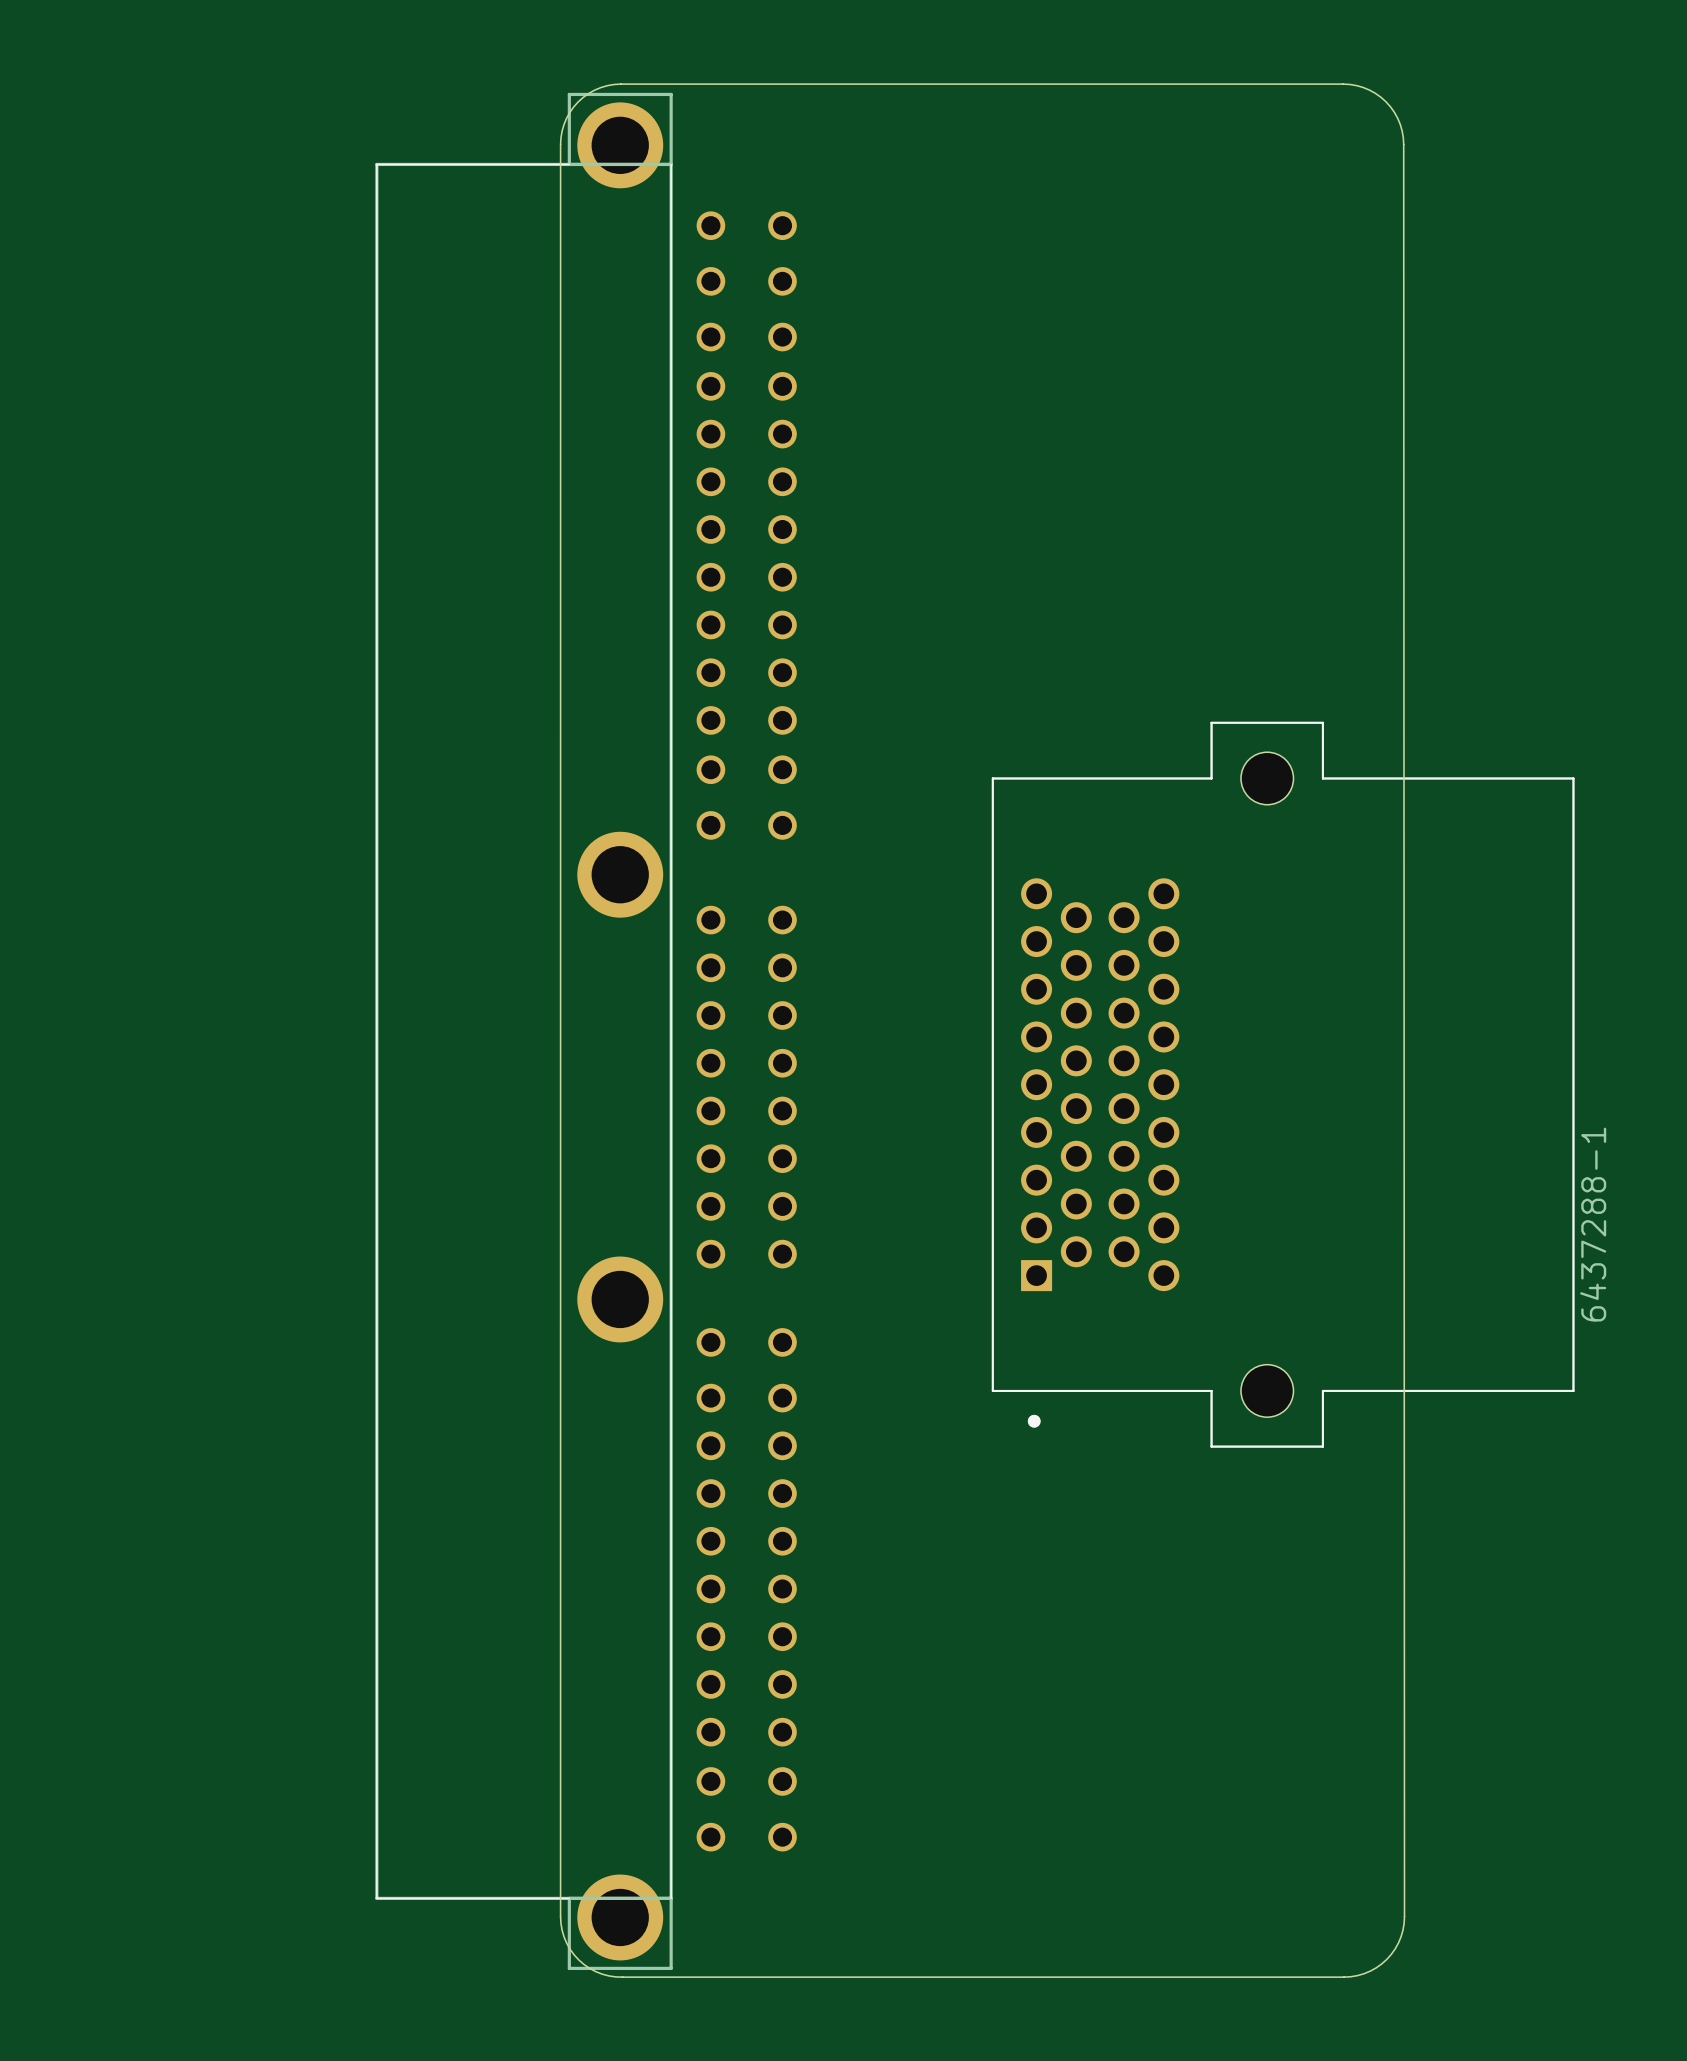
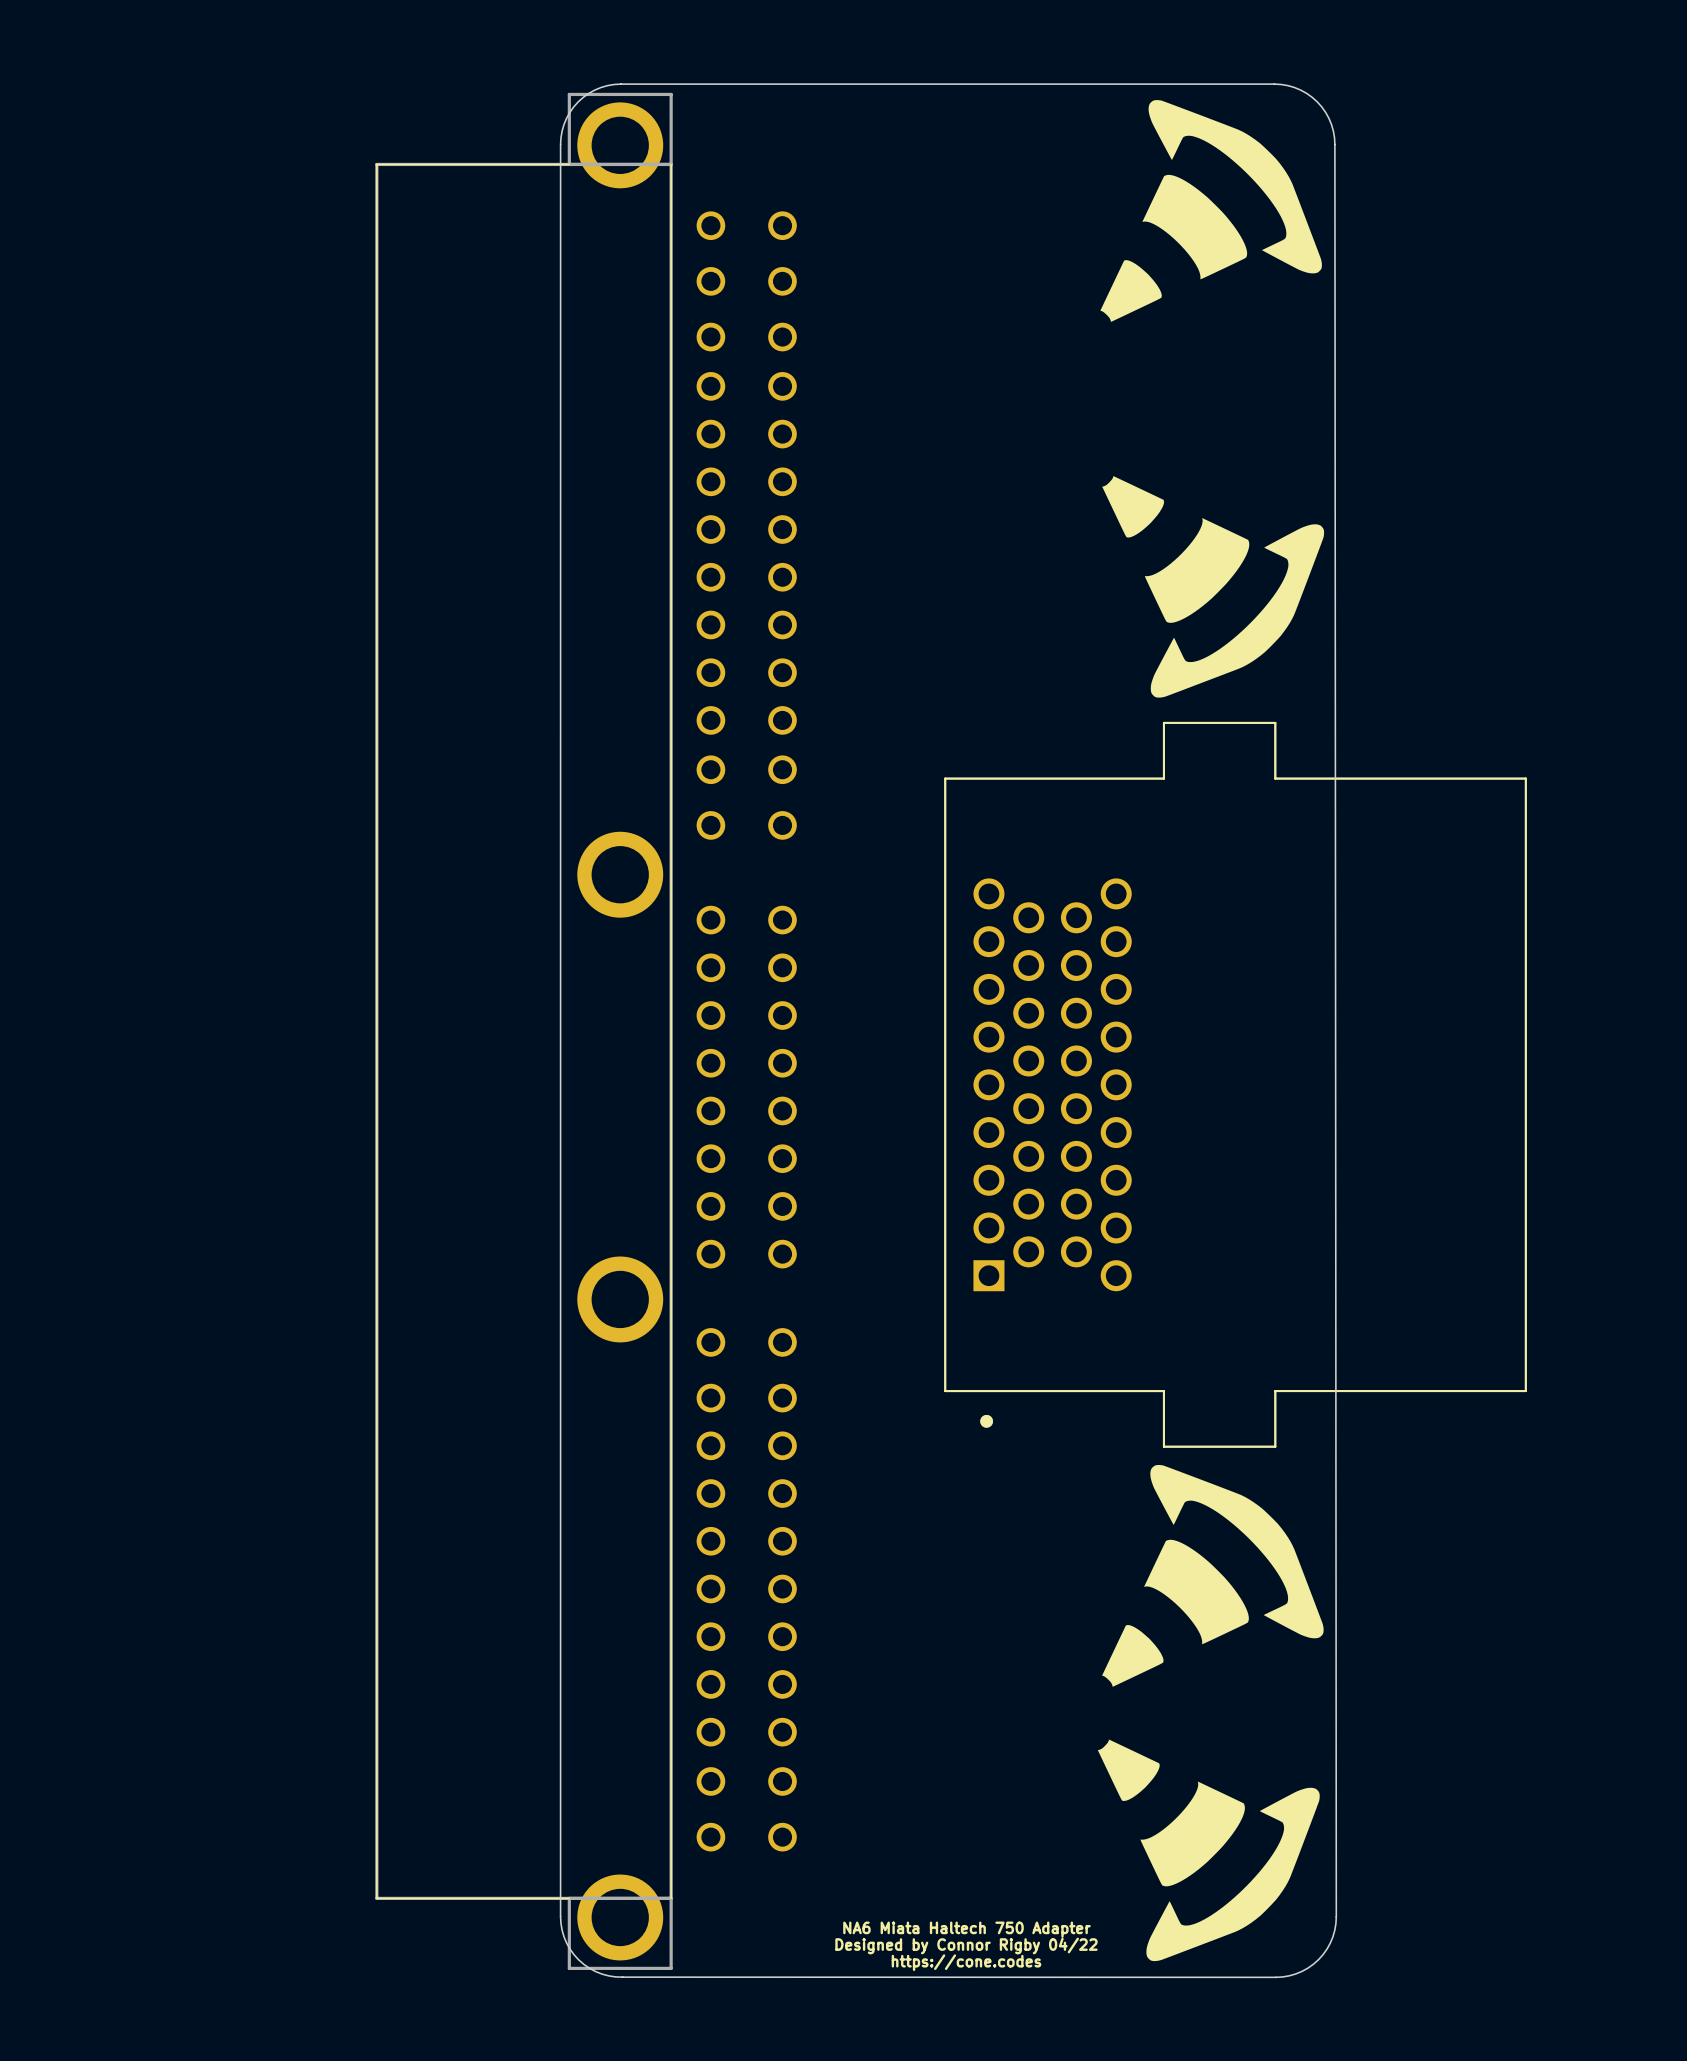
board edge: (1274, 84) (1350, 84) (1369, 90) (1380, 97) (1394, 112) (1400, 124) (1403, 137) (1404, 1916) (1401, 1936) (1395, 1948) (1381, 1963) (1364, 1973) (1344, 1977) (622, 1977) -> (1274, 84) (1294, 87) (1306, 93) (1317, 101) (1325, 112) (1331, 124) (1334, 144) (1336, 1916) (1332, 1936) (1327, 1949) (1313, 1964) (1295, 1973) (1282, 1976) (622, 1977)
drawing: none -> [1100, 100, 1322, 322]
drawing: none -> [1102, 476, 1325, 698]
part: none -> (1235, 1084)
part: 6437288-1 (1283, 1084) -> none
drawing: none -> [1102, 1464, 1324, 1687]
drawing: none -> [1097, 1739, 1320, 1962]
text: none -> NA6 Miata Haltech 750 Adapter (966, 1929)
text: none -> Designed by Connor Rigby 04/22 (966, 1946)
text: none -> https://cone.codes (966, 1962)

